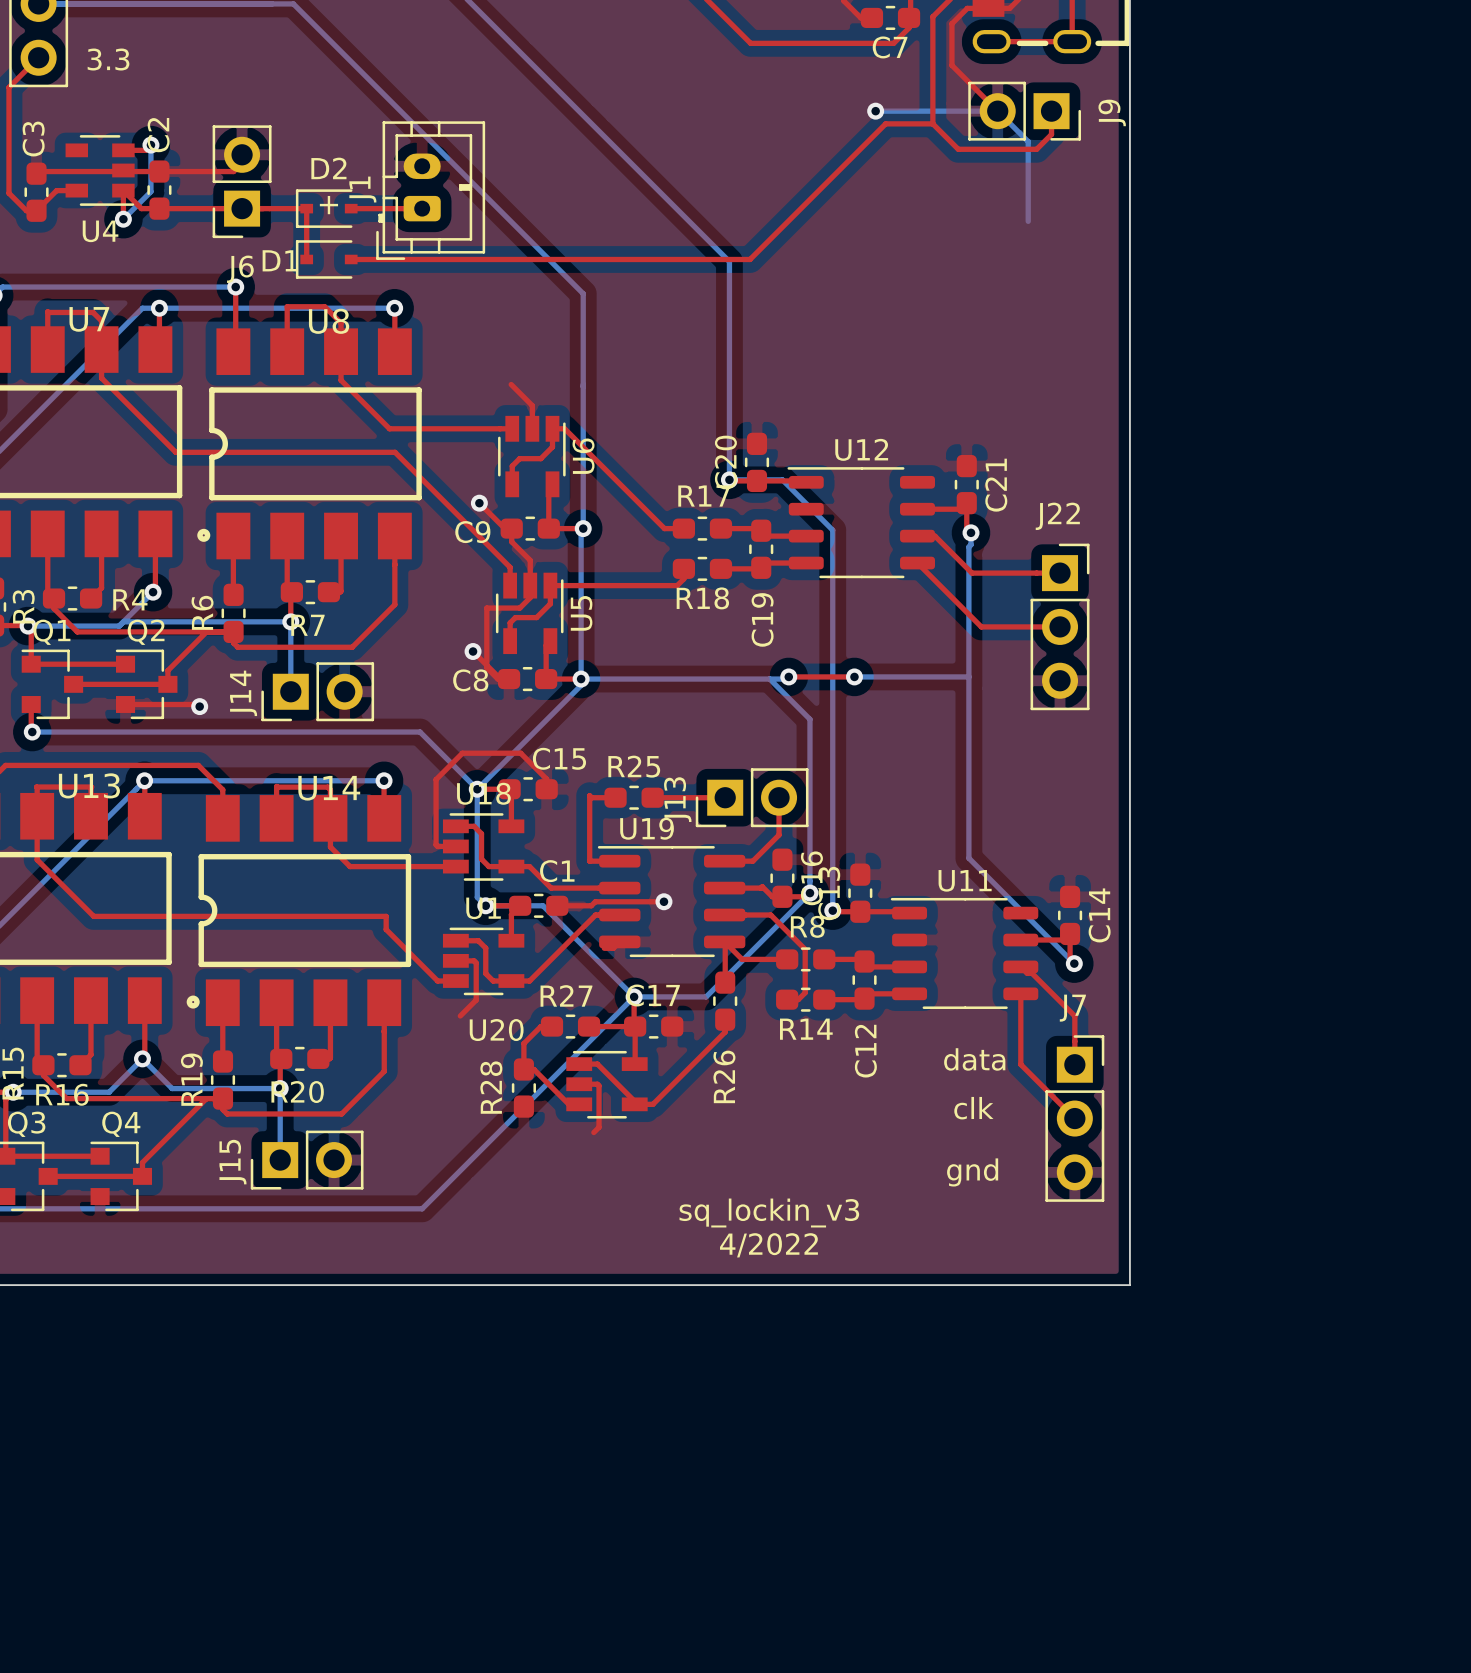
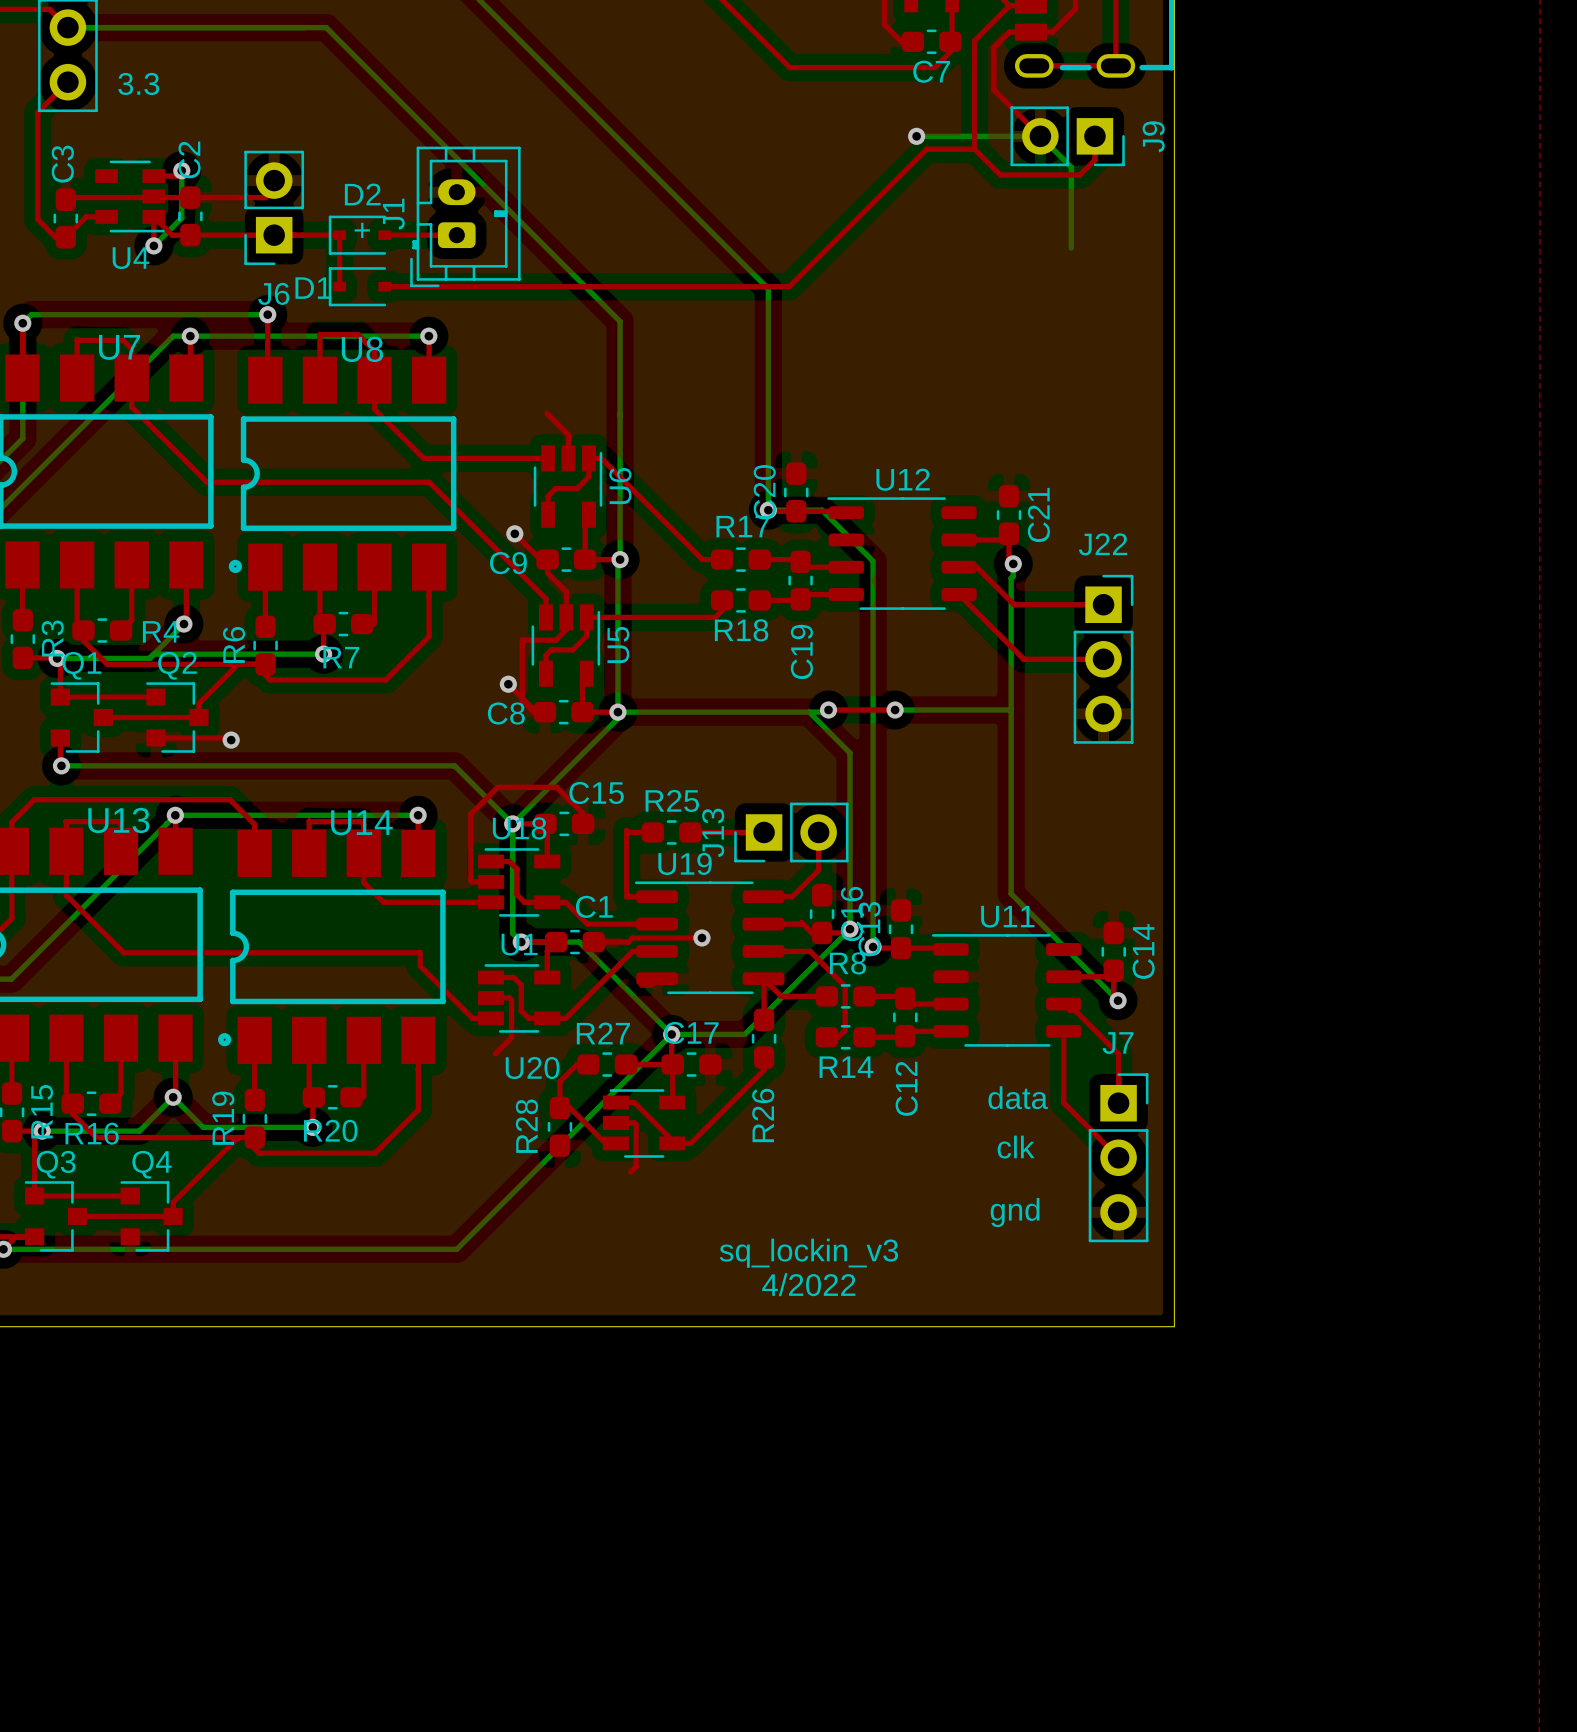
bottom track: (290, 621) (290, 691) -> none
J14: (317, 691) -> none
bottom track: (280, 1088) (280, 1160) -> none
J15: (307, 1160) -> none

